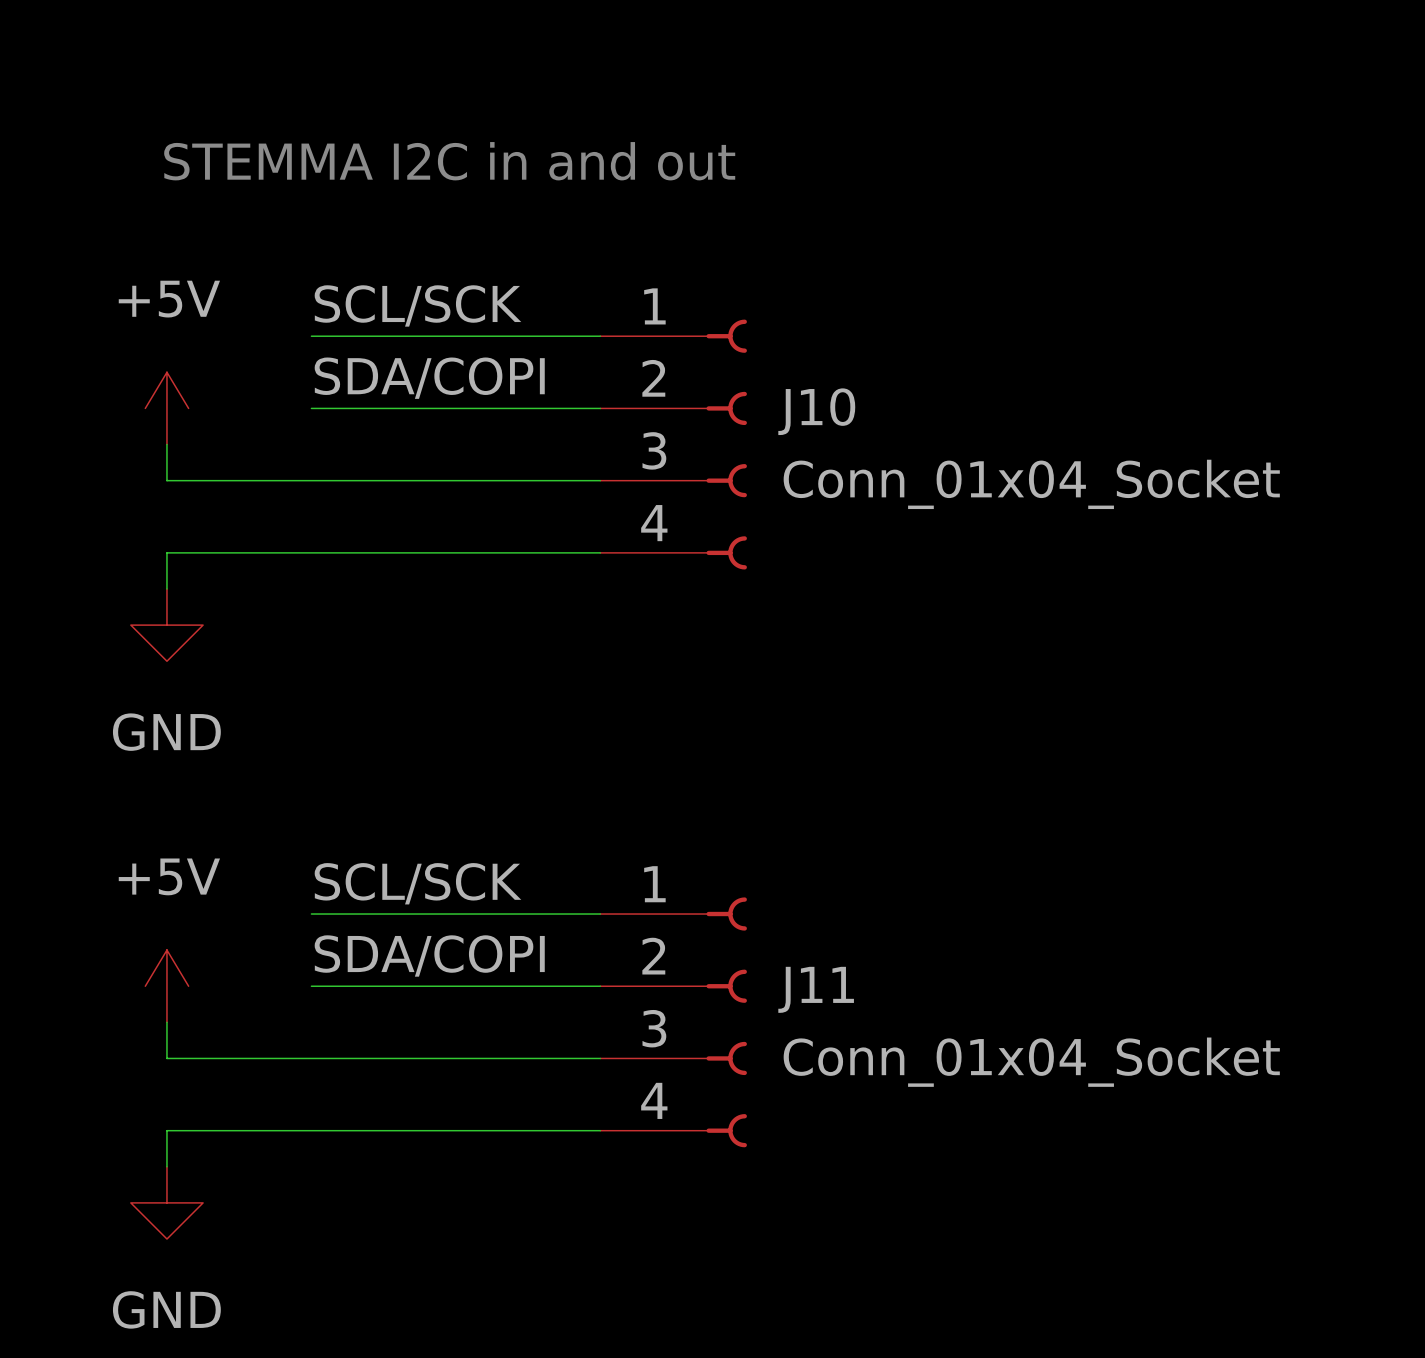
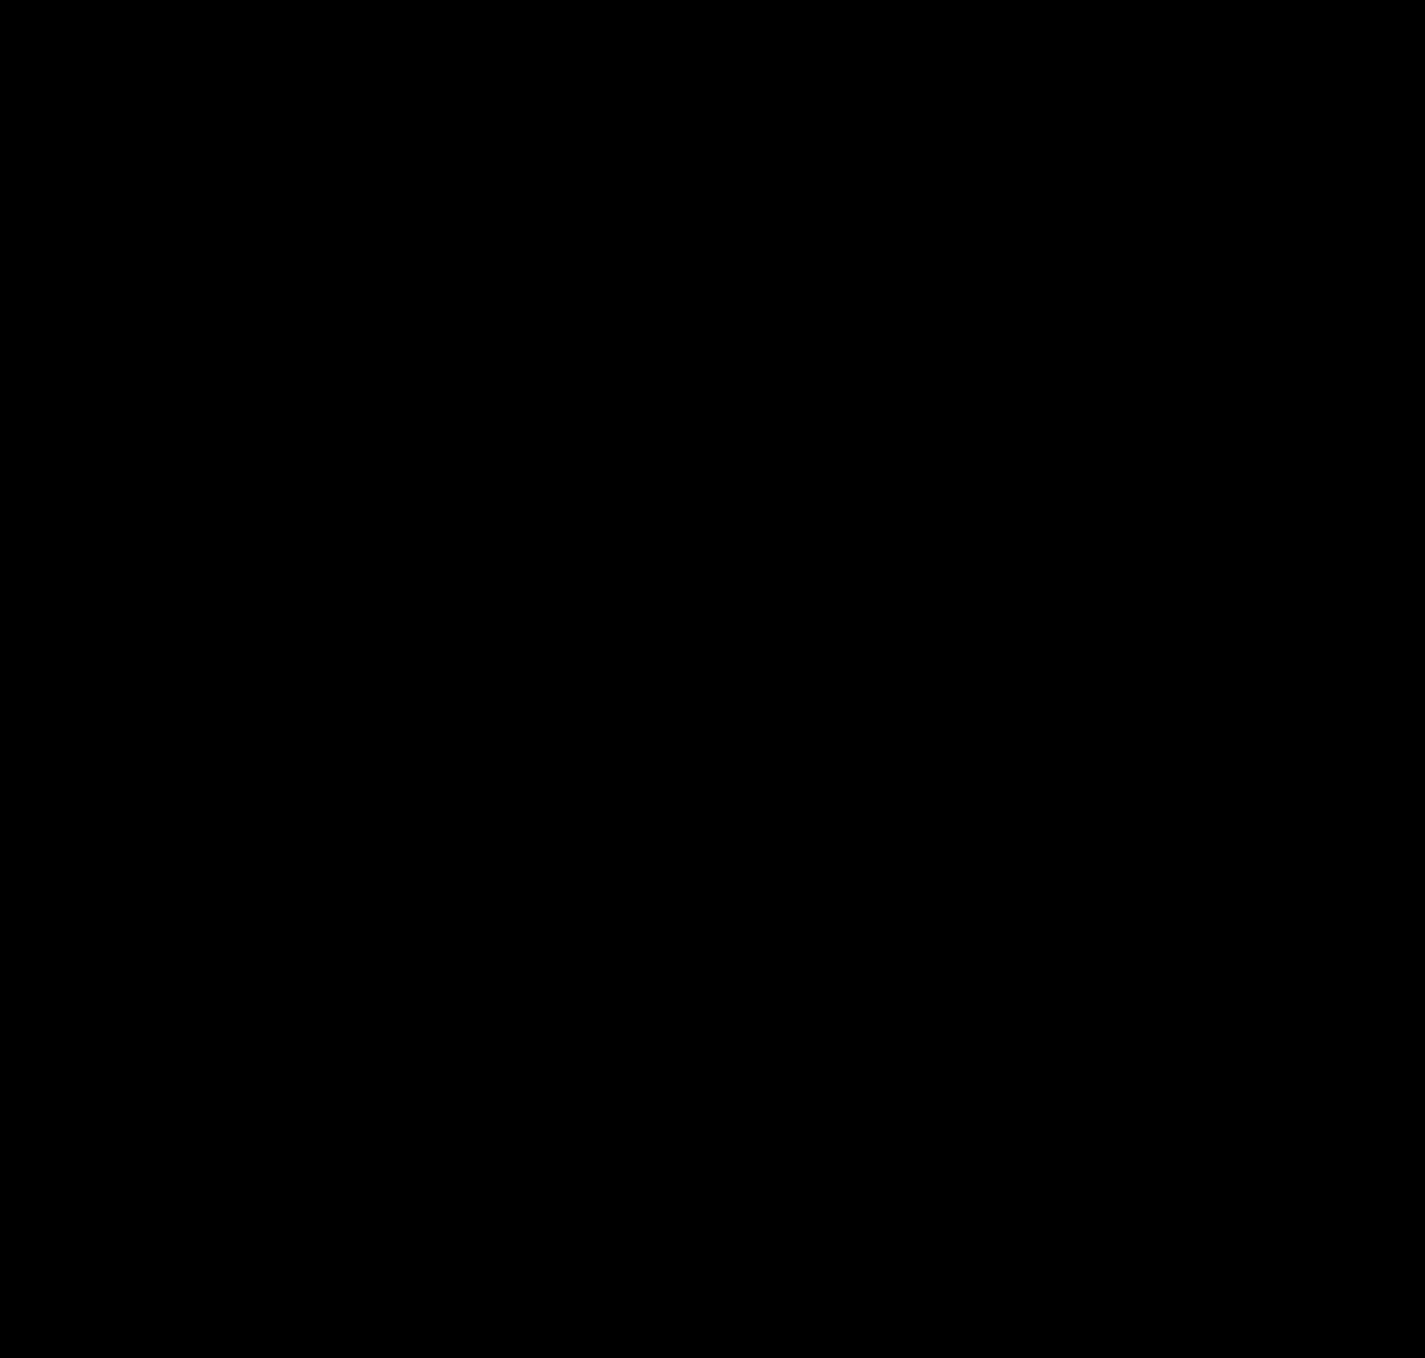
text: STEMMA I2C in and out (449, 161) -> none
label: SCL/SCK (417, 305) -> none
wire: (311, 336) (600, 336) -> none
label: SDA/COPI (429, 378) -> none
power symbol: +5V (166, 408) -> none
wire: (311, 408) (600, 408) -> none
wire: (166, 444) (166, 480) (600, 480) -> none
J10: Conn_01x04_Socket (673, 444) -> none
wire: (600, 552) (166, 552) (166, 589) -> none
power symbol: GND (166, 625) -> none
label: SCL/SCK (417, 883) -> none
wire: (311, 914) (600, 914) -> none
label: SDA/COPI (429, 955) -> none
power symbol: +5V (166, 986) -> none
wire: (311, 986) (600, 986) -> none
wire: (166, 1022) (166, 1058) (600, 1058) -> none
J11: Conn_01x04_Socket (673, 1022) -> none
wire: (600, 1130) (166, 1130) (166, 1166) -> none
power symbol: GND (166, 1202) -> none

